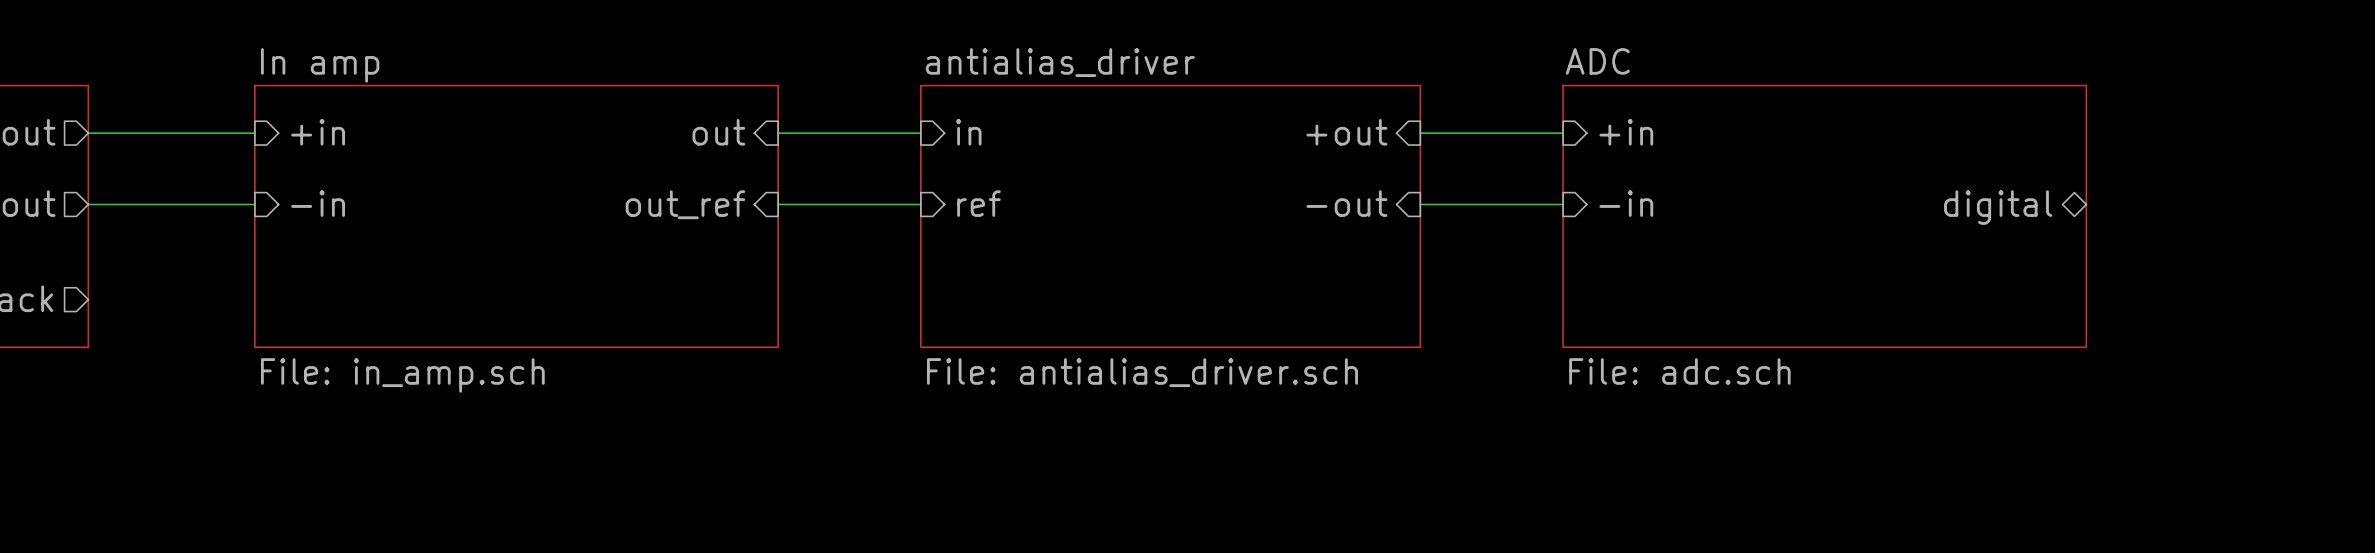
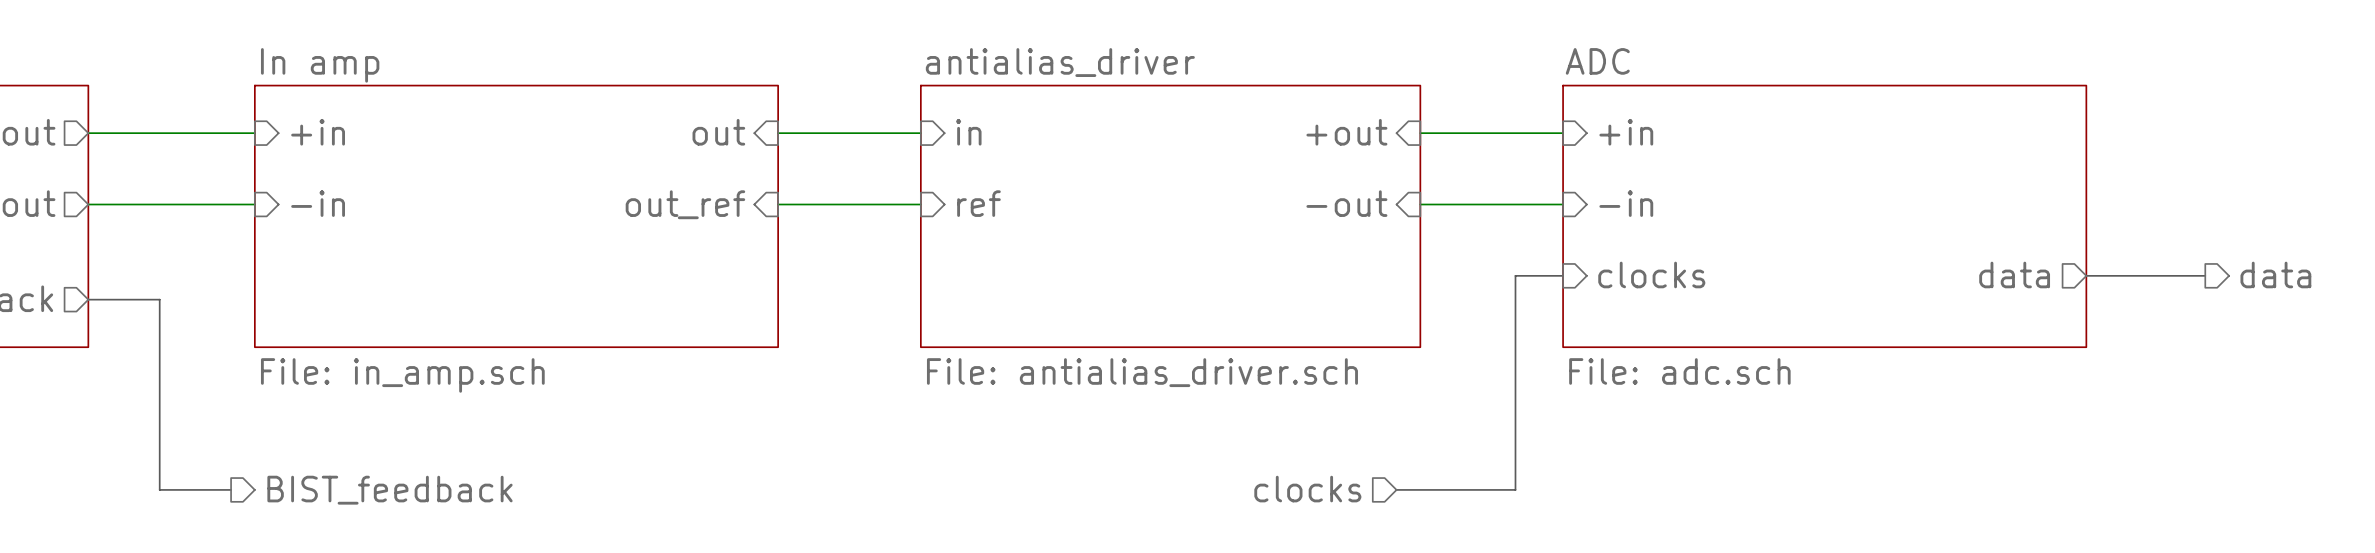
sheet pin: digital (1998, 207) -> none
sheet pin: none -> clocks (1651, 274)
sheet pin: none -> data (2014, 274)
hierarchical label: none -> data (2275, 274)
bus: none -> (1563, 275) (1515, 275) (1515, 489) (1396, 489)
bus: none -> (2086, 275) (2205, 275)
bus: none -> (88, 299) (159, 299) (159, 489) (231, 489)
hierarchical label: none -> clocks (1307, 489)
hierarchical label: none -> BIST_feedback (390, 490)

